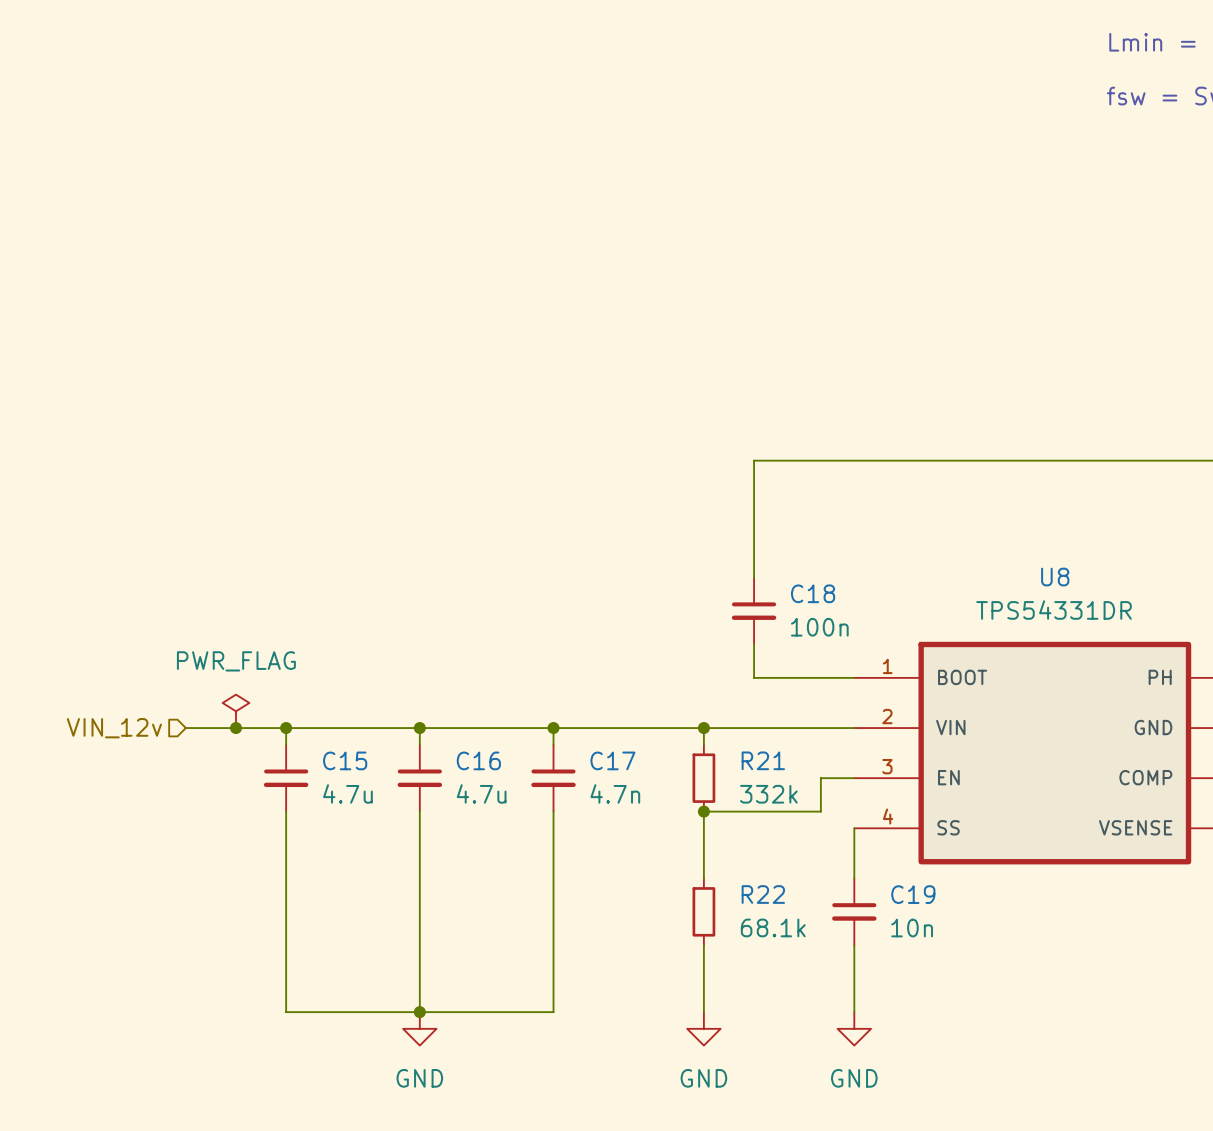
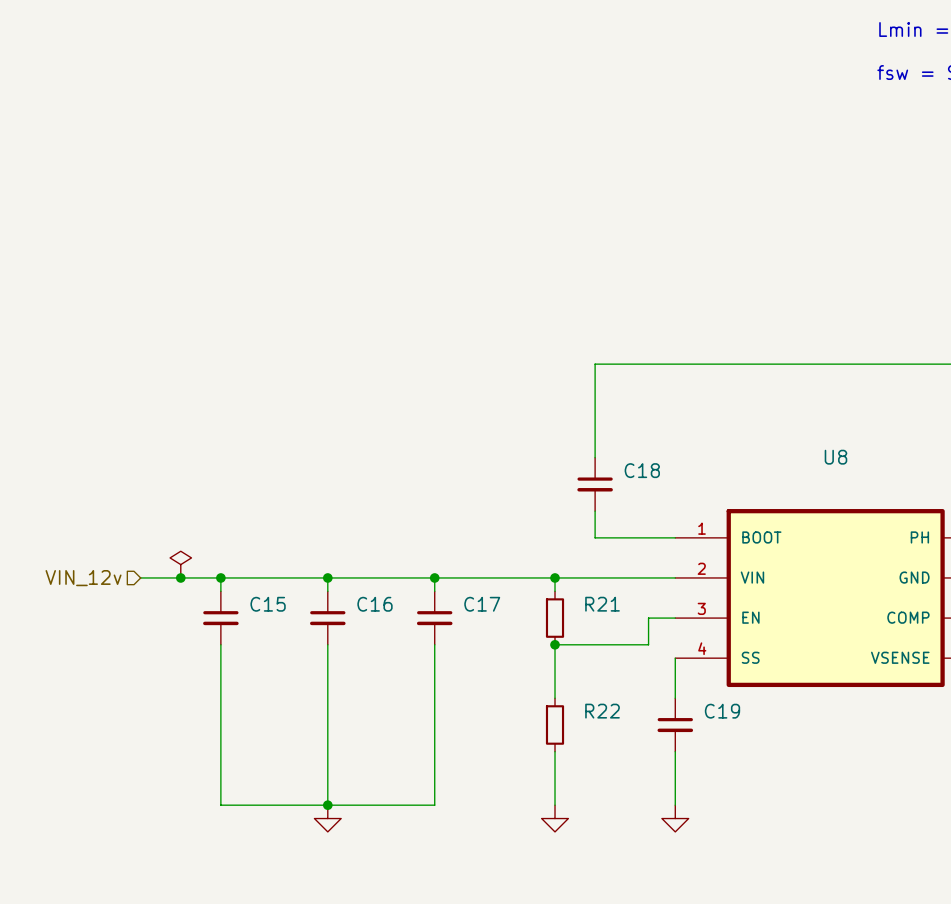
U8 value: TPS54331DR (1054, 610) -> none
C18 value: 100n (819, 627) -> none
power symbol text: PWR_FLAG (236, 661) -> none
C15 value: 4.7u (347, 793) -> none
C16 value: 4.7u (481, 793) -> none
C17 value: 4.7n (615, 793) -> none
R21 value: 332k (768, 794) -> none
R22 value: 68.1k (773, 927) -> none
C19 value: 10n (912, 928) -> none
power symbol text: GND (419, 1078) -> none
power symbol text: GND (703, 1078) -> none
power symbol text: GND (854, 1078) -> none

